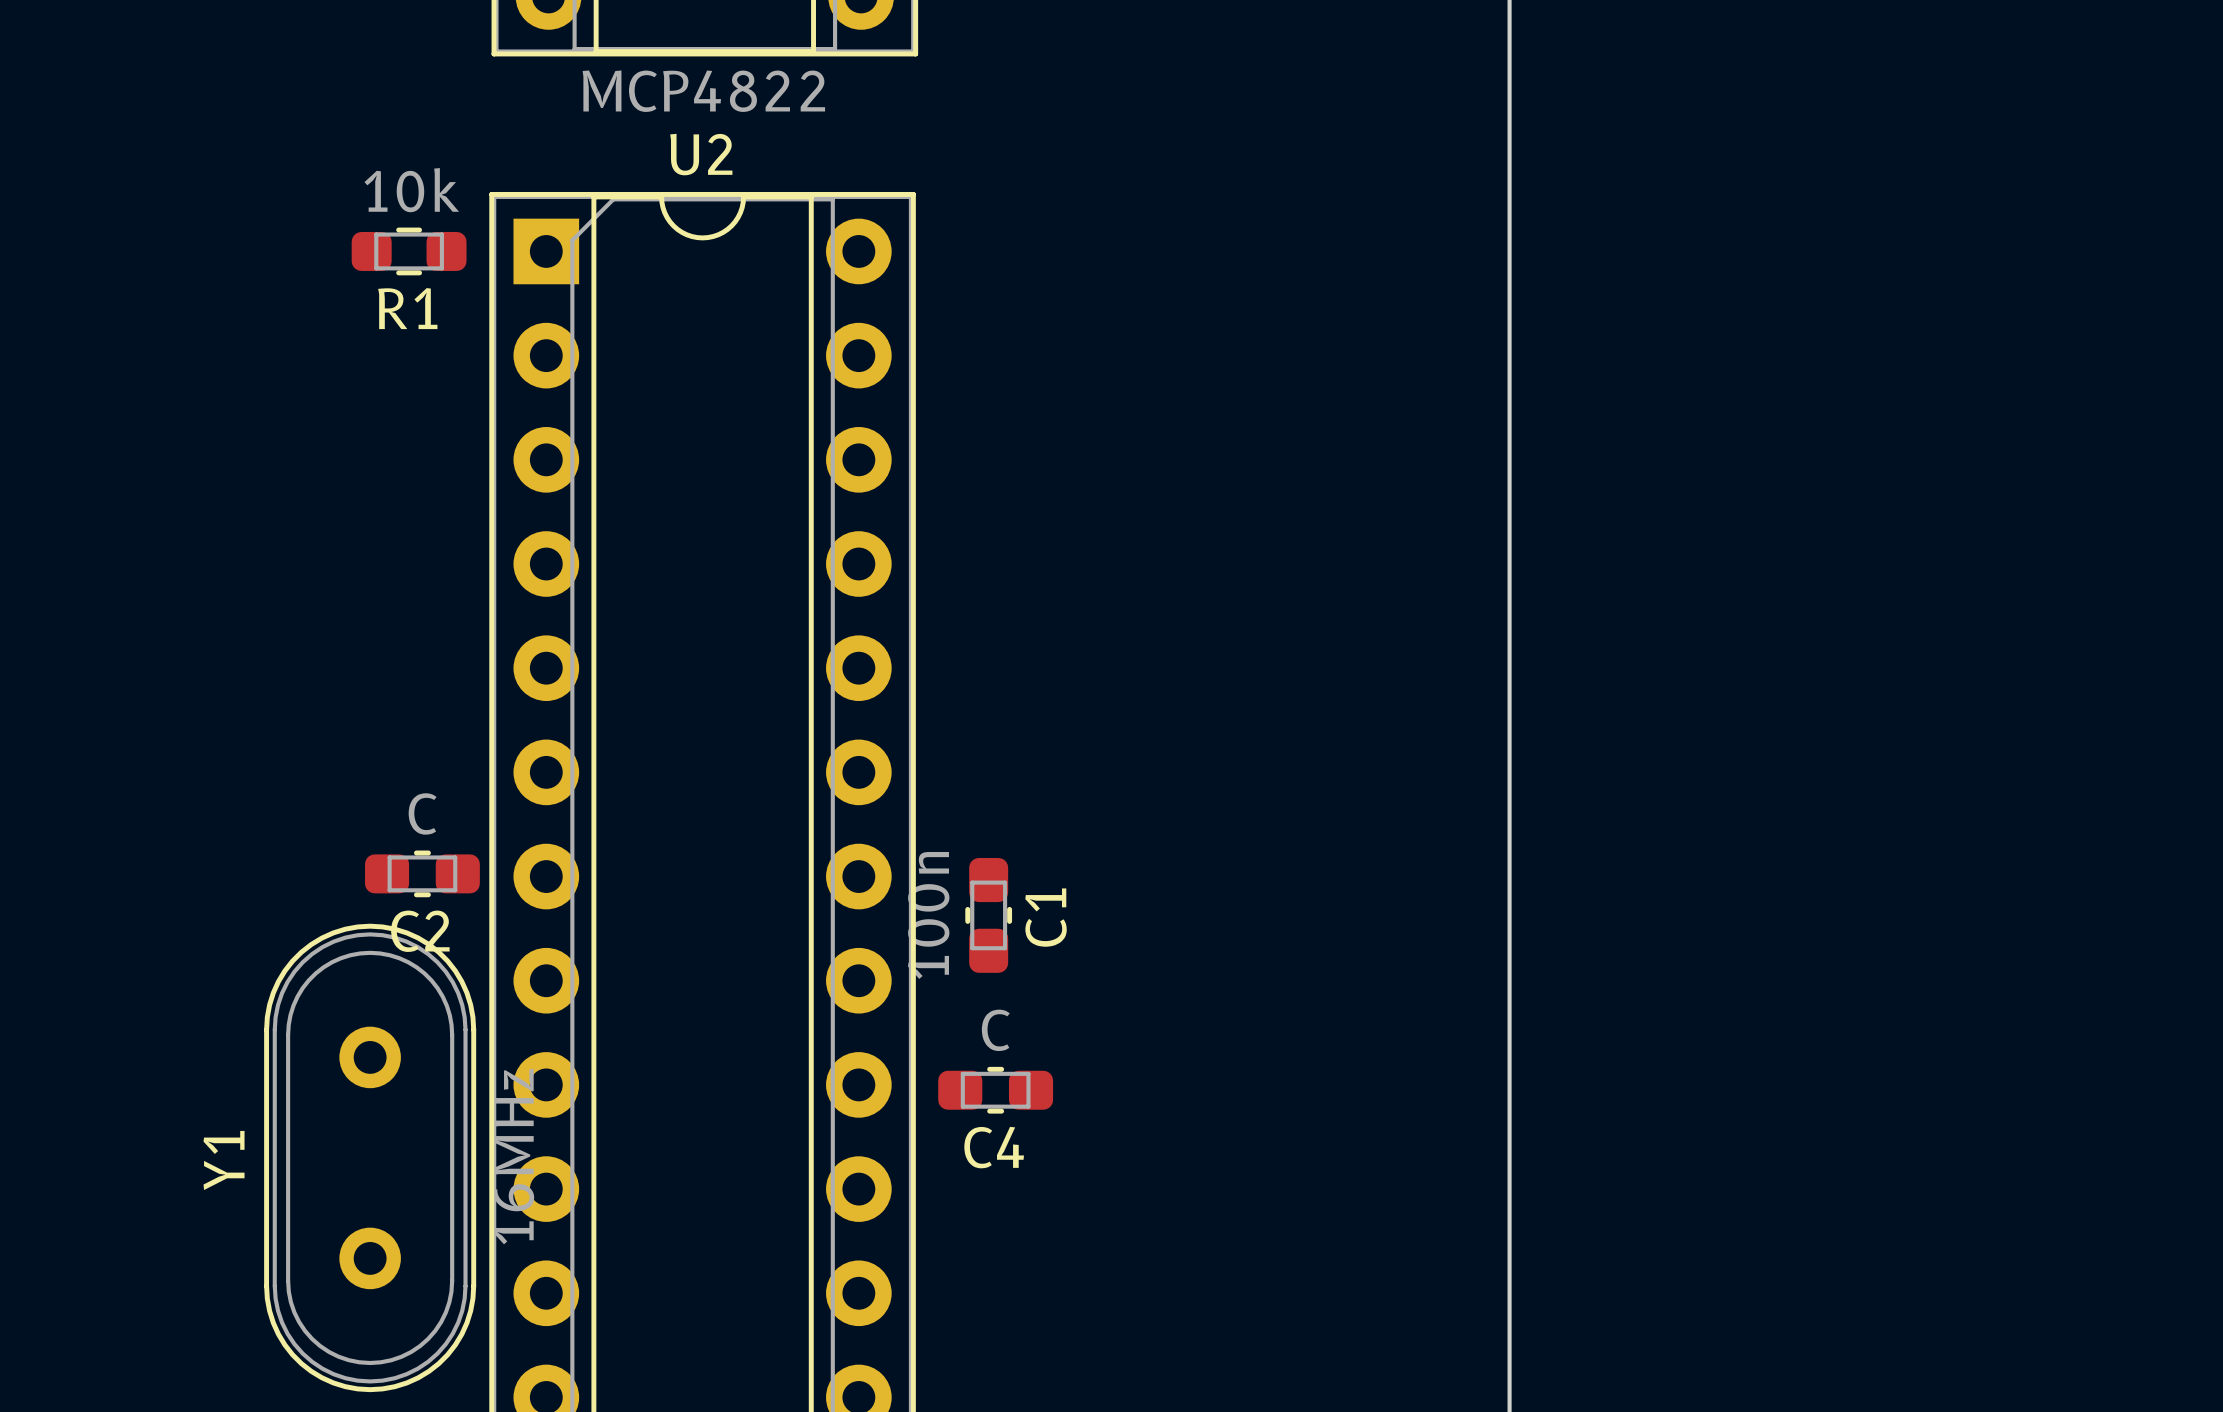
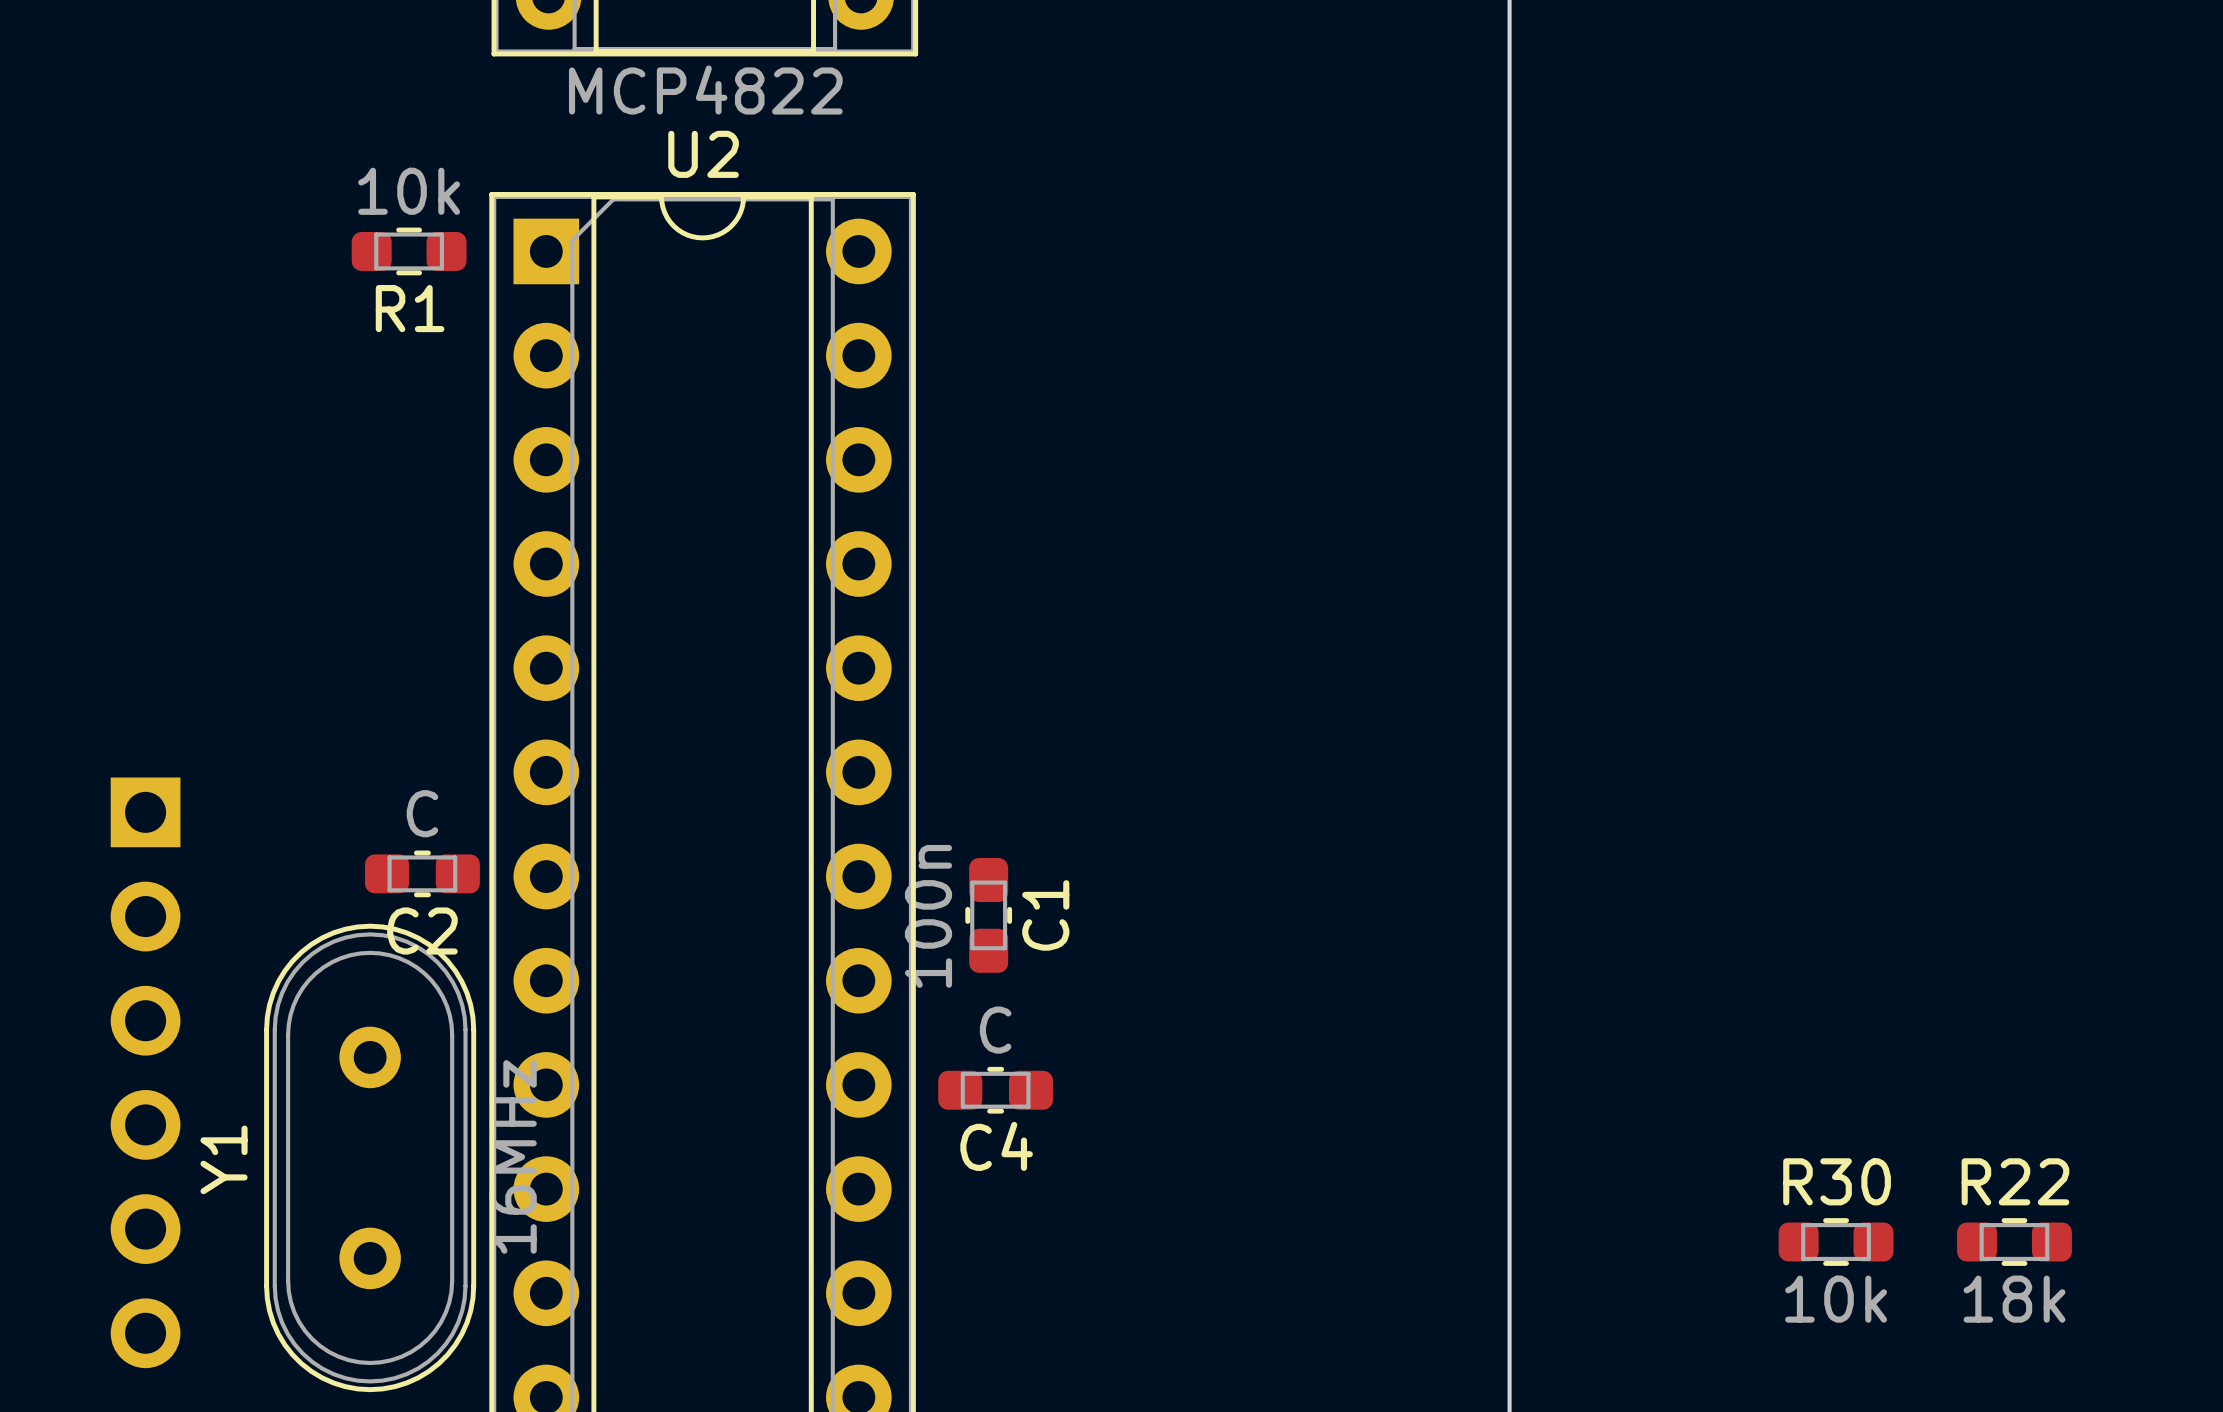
part: none -> (145, 1072)
R30: none -> 10k (1836, 1242)
R22: none -> 18k (2014, 1242)

